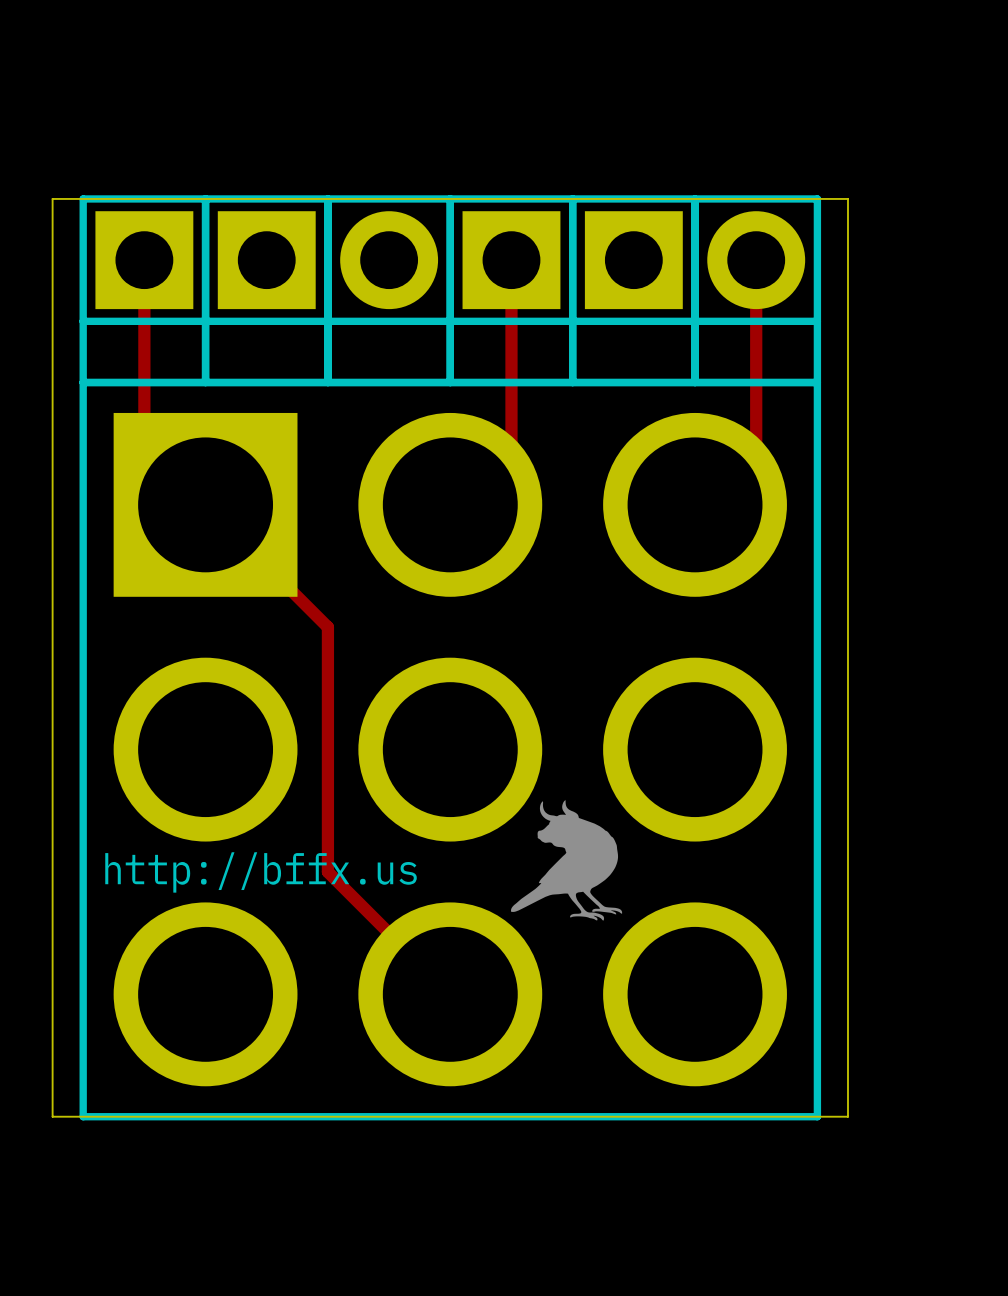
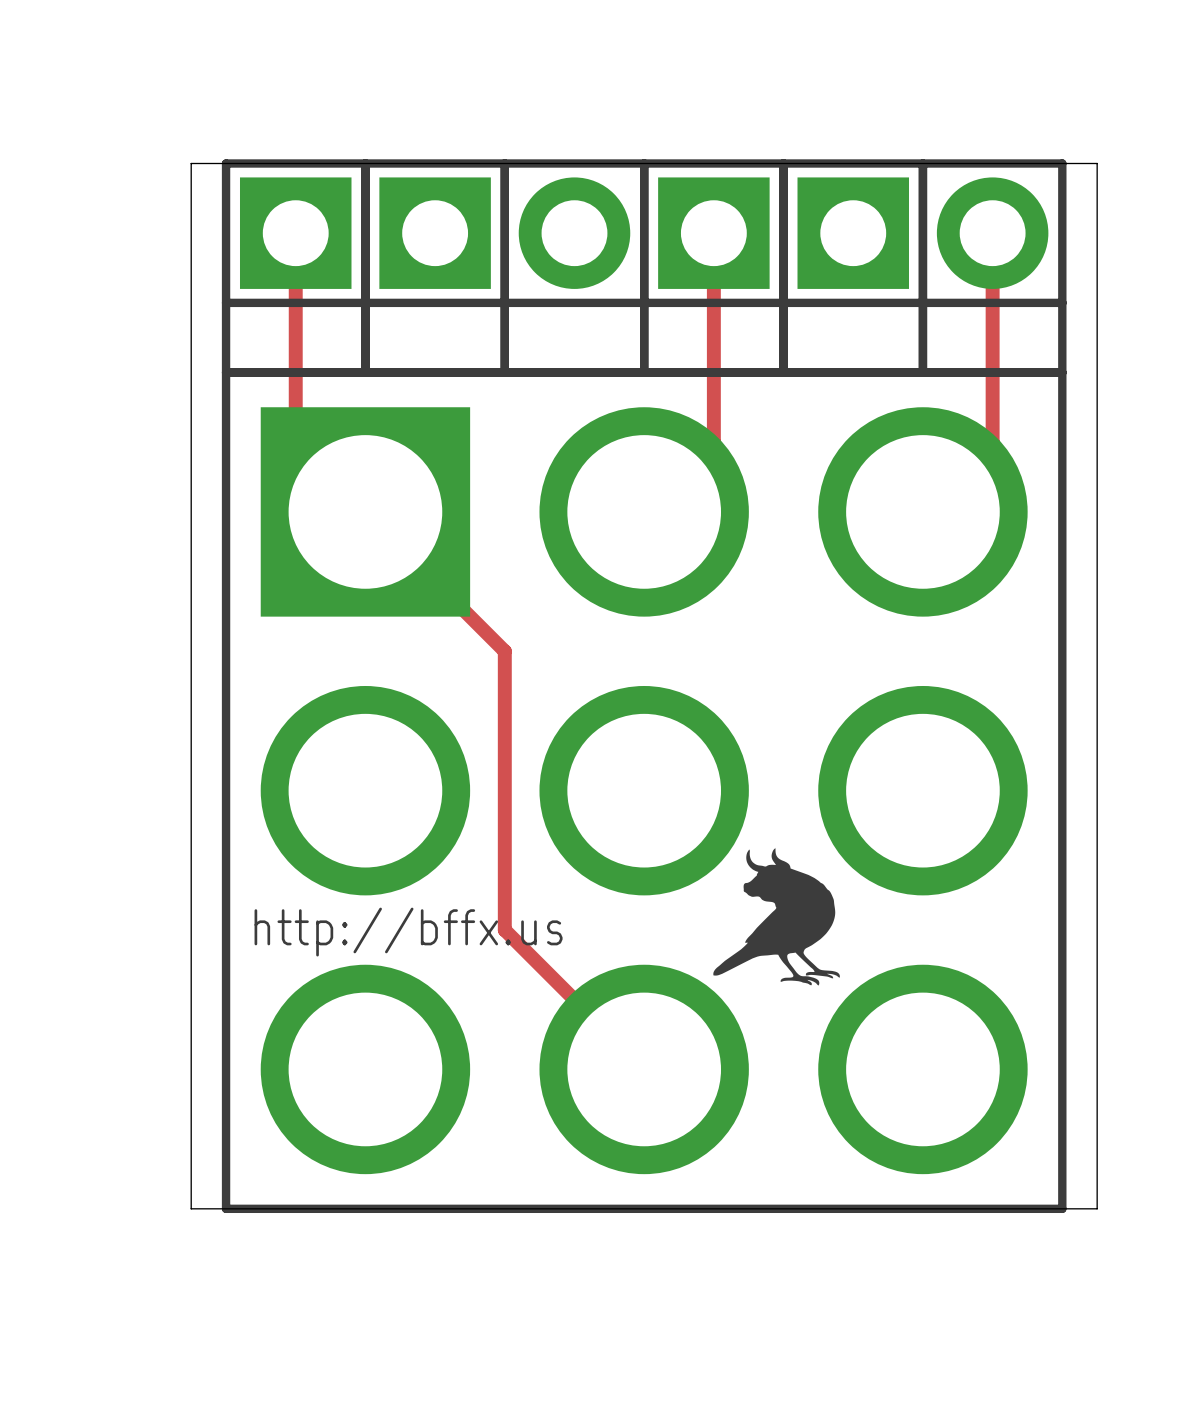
drawing shape: [510, 798, 623, 921] -> [713, 846, 840, 986]

